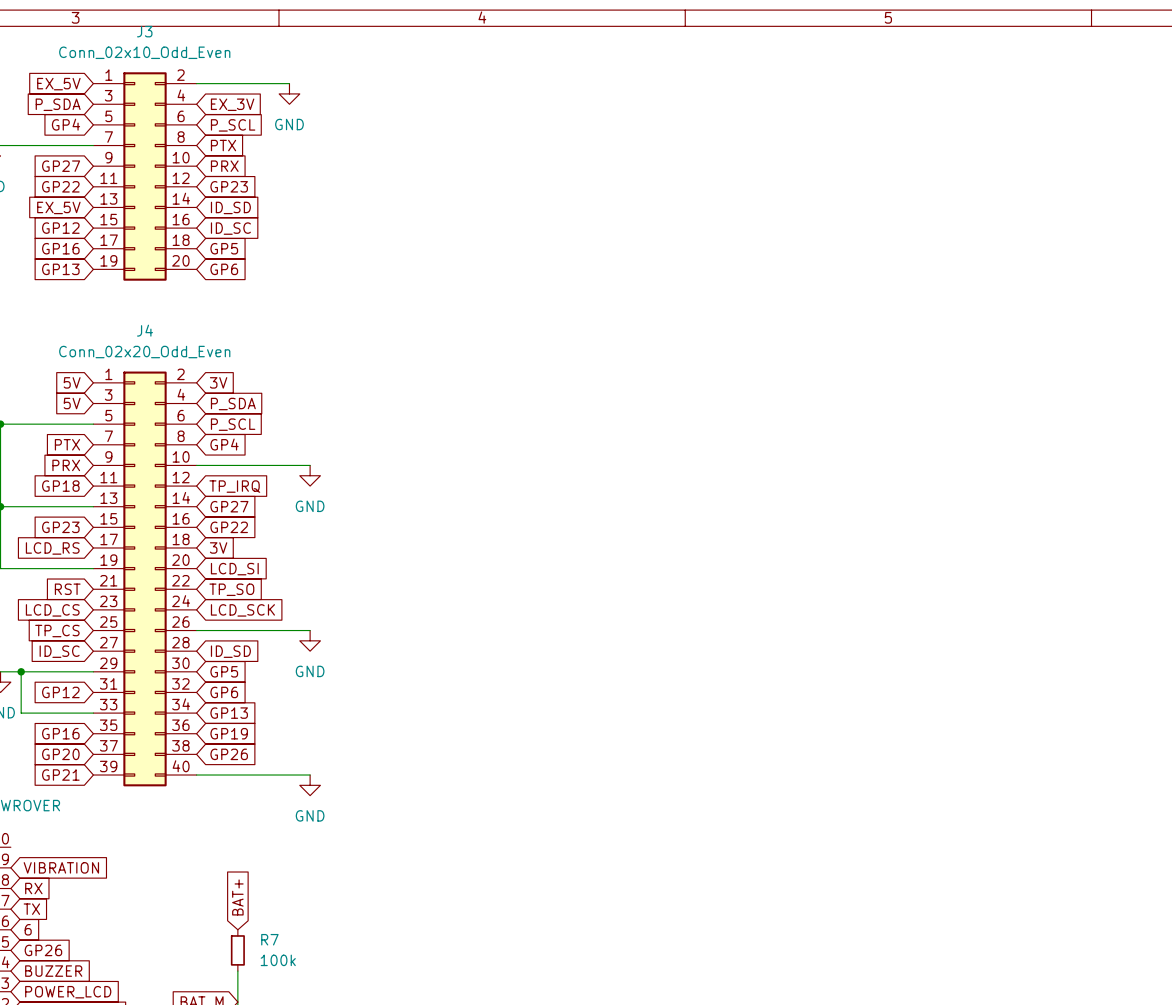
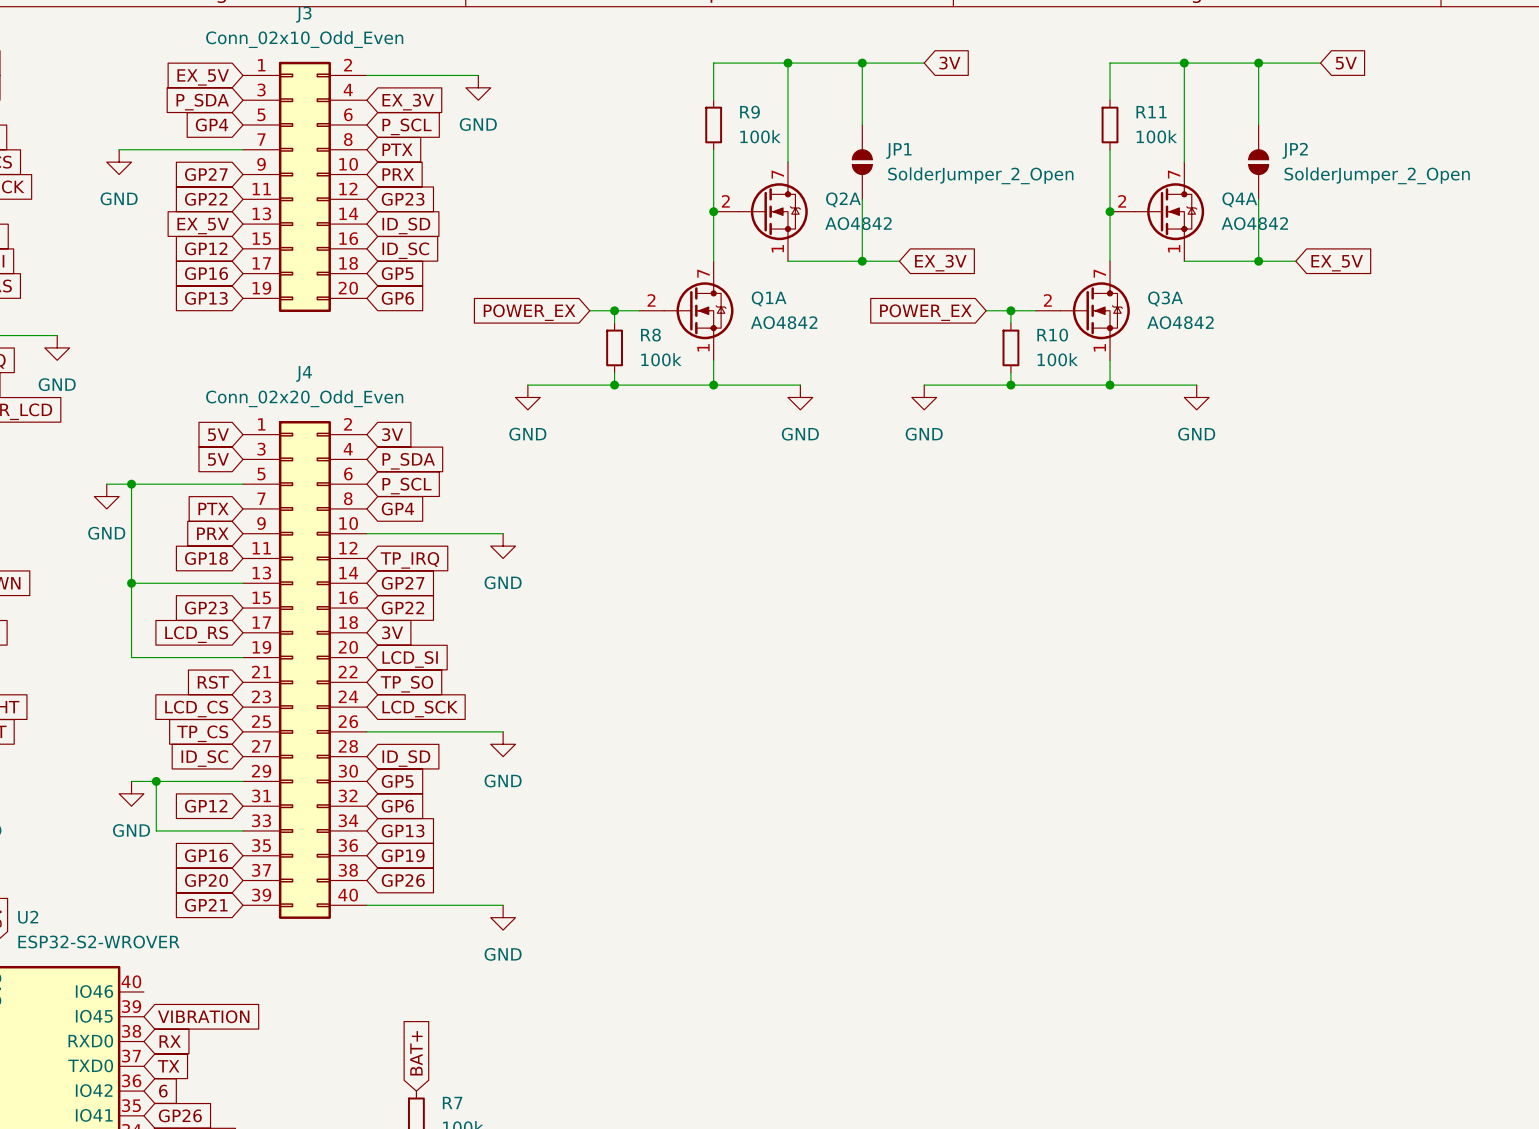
wire: none -> (787, 63) (787, 162)
junction: none -> (787, 63)
wire: none -> (862, 63) (862, 124)
junction: none -> (862, 63)
wire: none -> (924, 63) (713, 63) (713, 100)
global label: none -> 3V (949, 63)
wire: none -> (1184, 63) (1184, 162)
junction: none -> (1184, 63)
wire: none -> (1258, 63) (1258, 124)
junction: none -> (1258, 63)
wire: none -> (1320, 63) (1110, 63) (1110, 100)
global label: none -> 5V (1346, 63)
R9: none -> 100k (713, 124)
R11: none -> 100k (1110, 124)
wire: none -> (713, 149) (713, 261)
wire: none -> (1110, 149) (1110, 261)
JP1: none -> SolderJumper_2_Open (862, 162)
JP2: none -> SolderJumper_2_Open (1258, 162)
wire: none -> (862, 199) (862, 261)
wire: none -> (1258, 199) (1258, 261)
junction: none -> (713, 211)
Q2A: none -> AO4842 (760, 211)
junction: none -> (1110, 211)
Q4A: none -> AO4842 (1157, 211)
wire: none -> (787, 261) (899, 261)
junction: none -> (862, 261)
global label: none -> EX_3V (940, 263)
wire: none -> (1184, 261) (1295, 261)
junction: none -> (1258, 261)
global label: none -> EX_5V (1337, 263)
wire: none -> (589, 310) (639, 310)
wire: none -> (614, 310) (614, 323)
junction: none -> (614, 310)
Q1A: none -> AO4842 (686, 310)
wire: none -> (986, 310) (1035, 310)
wire: none -> (1010, 310) (1010, 323)
junction: none -> (1010, 310)
Q3A: none -> AO4842 (1082, 310)
global label: none -> POWER_EX (529, 312)
global label: none -> POWER_EX (925, 312)
R8: none -> 100k (614, 347)
R10: none -> 100k (1010, 347)
wire: none -> (713, 360) (713, 385)
wire: none -> (1110, 360) (1110, 385)
wire: none -> (614, 372) (614, 385)
wire: none -> (1010, 372) (1010, 385)
wire: none -> (527, 385) (800, 385)
junction: none -> (614, 385)
junction: none -> (713, 385)
wire: none -> (924, 385) (1196, 385)
junction: none -> (1010, 385)
junction: none -> (1110, 385)
power symbol: none -> GND (527, 397)
power symbol: none -> GND (800, 397)
power symbol: none -> GND (924, 397)
power symbol: none -> GND (1196, 397)

